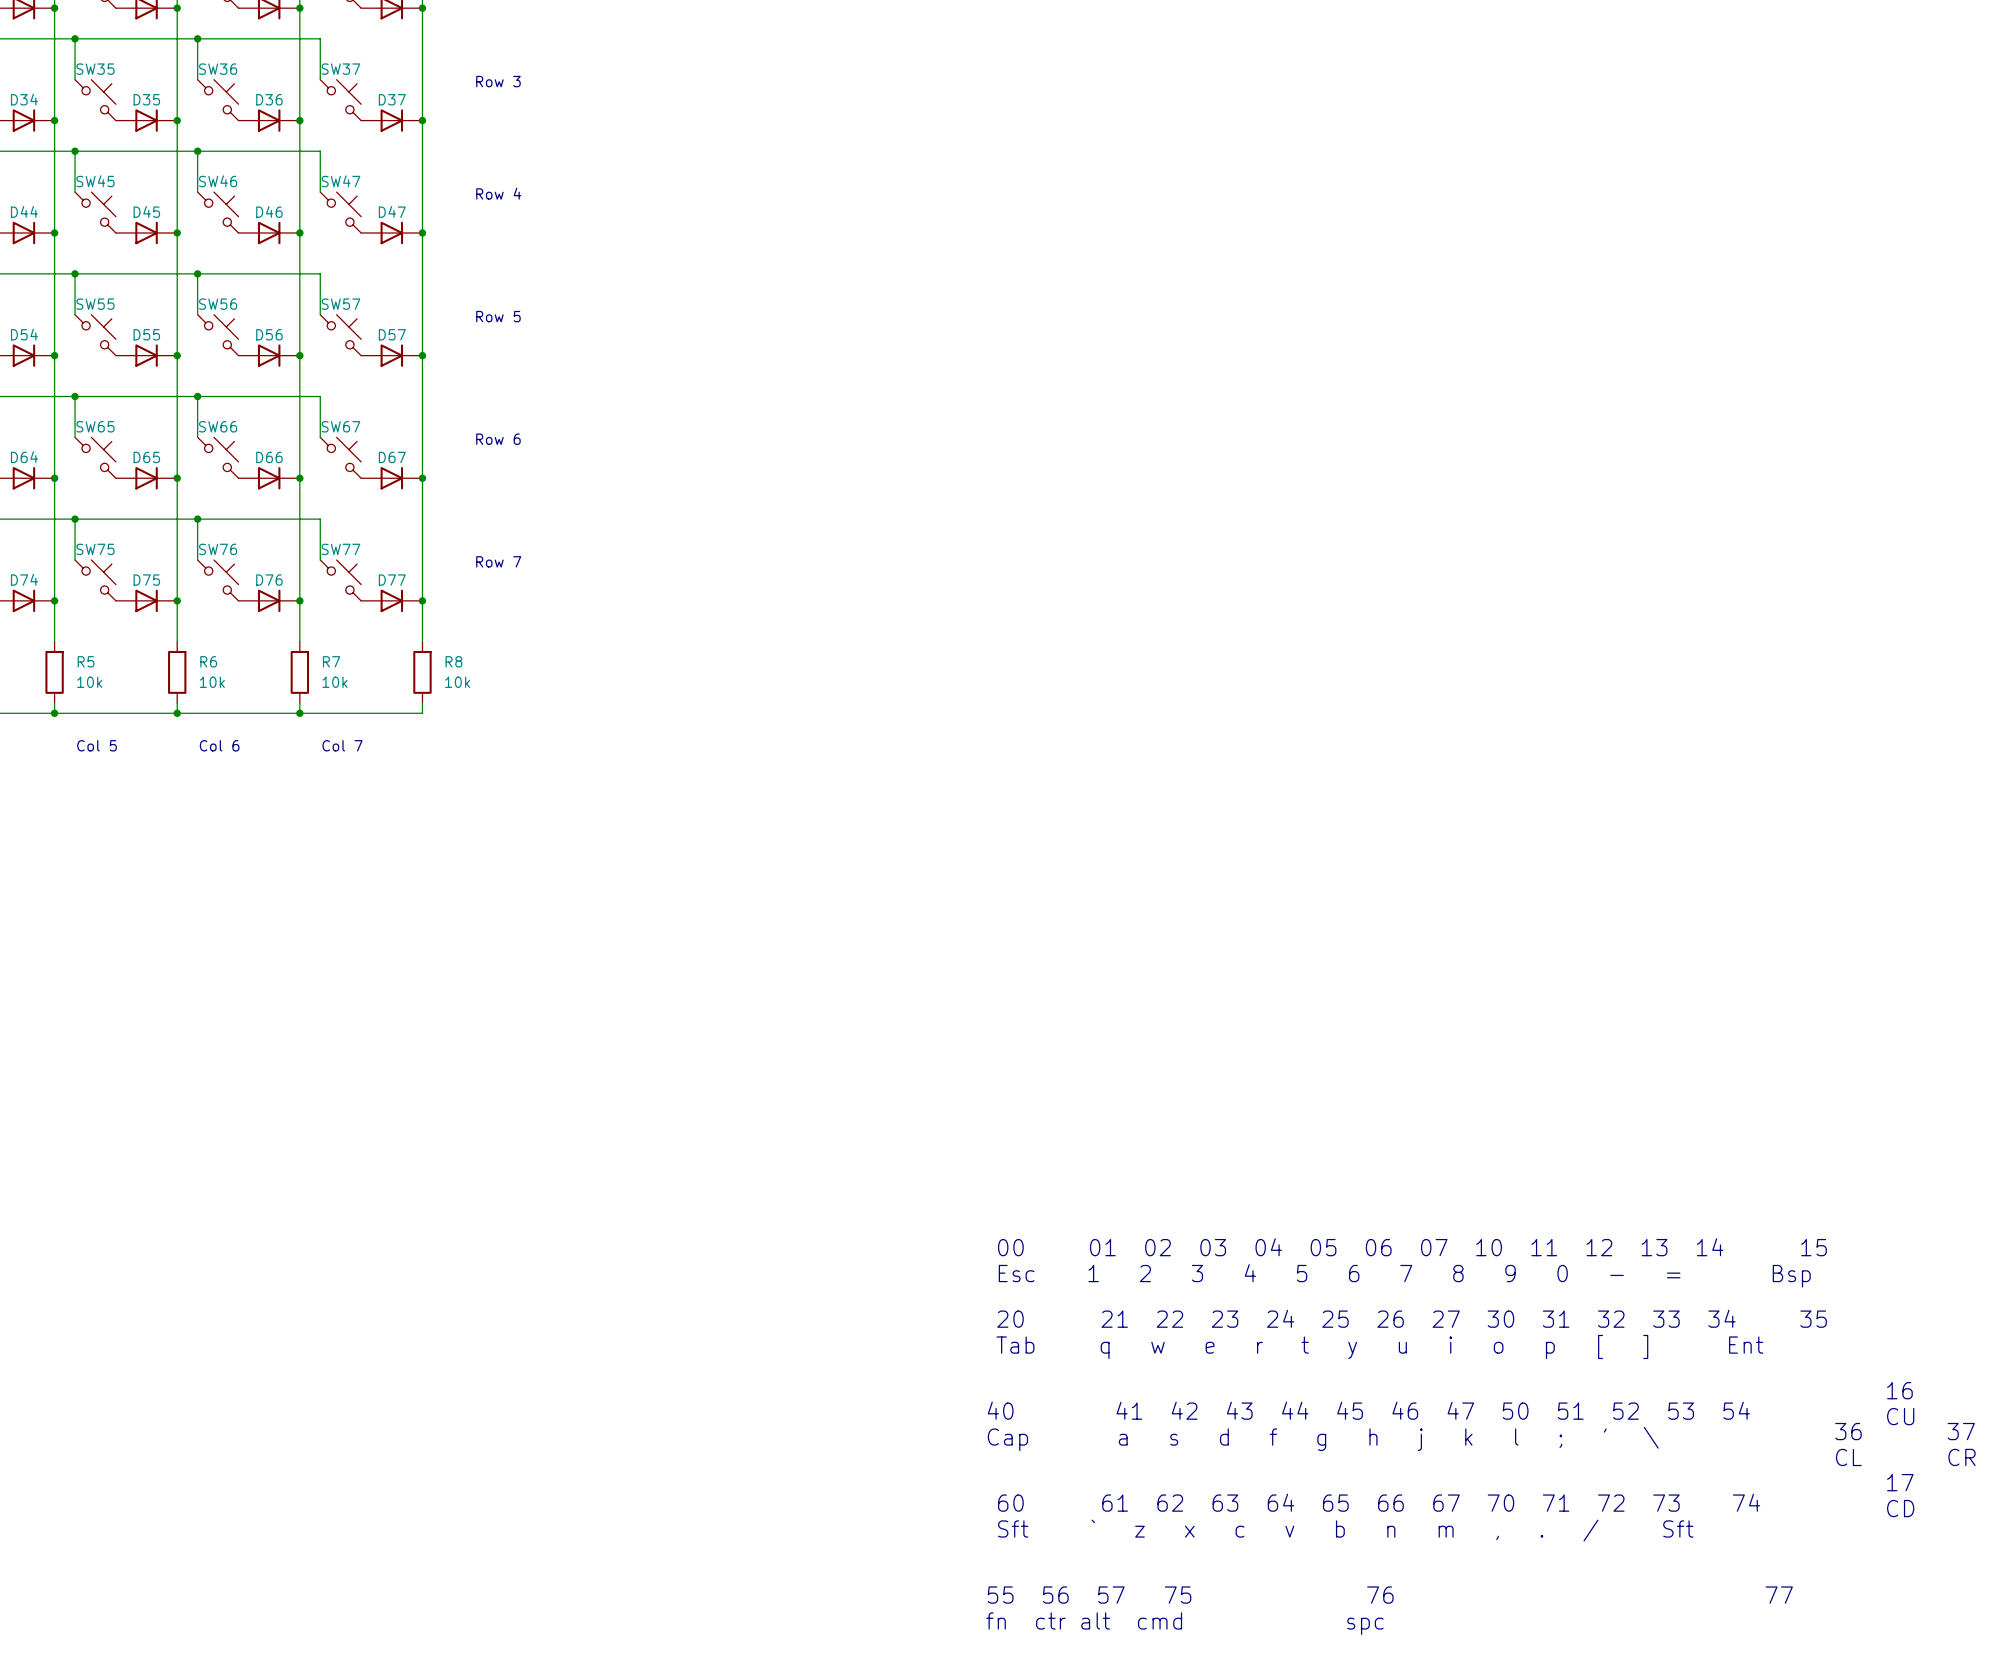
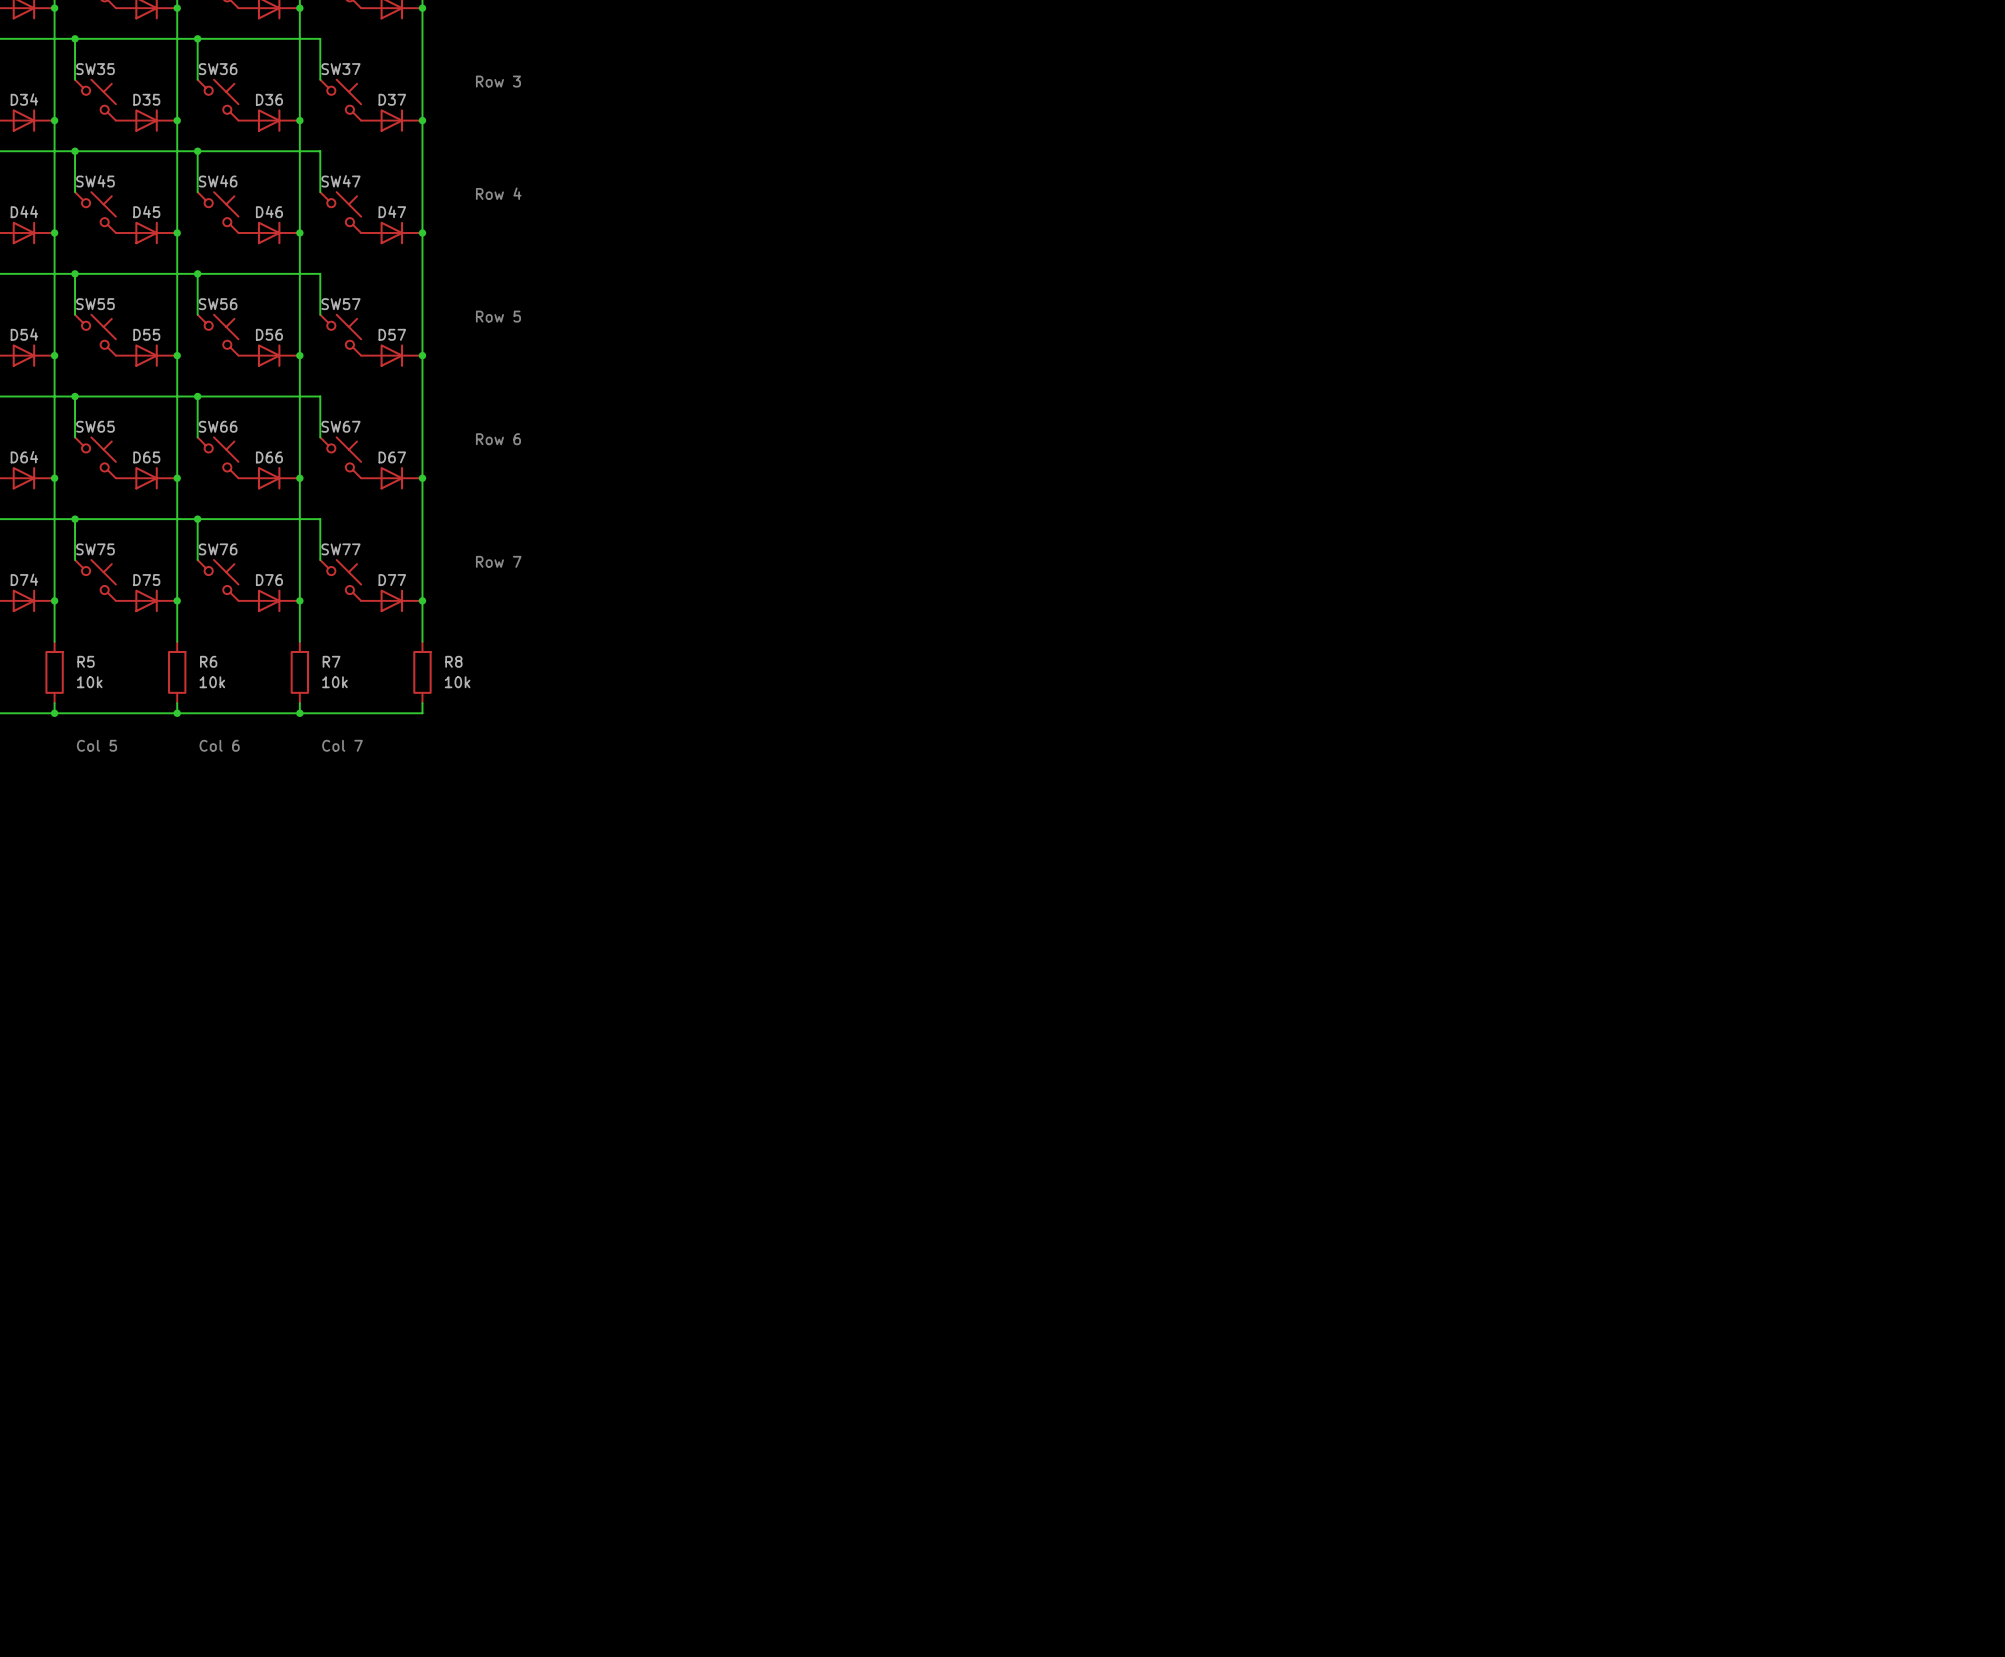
text: 00 01 02 03 04 05 06 07 10 11 12 13 14 15 (1412, 1247) -> none
text: Esc 1 2 3 4 5 6 7 8 9 0 - = Bsp (1404, 1275) -> none
text: 20 21 22 23 24 25 26 27 30 31 32 33 34 35 (1412, 1318) -> none
text: Tab q w e r t y u i o p [ ] Ent (1379, 1346) -> none
text: 16 (1899, 1390) -> none
text: 40 41 42 43 44 45 46 47 50 51 52 53 54 (1368, 1410) -> none
text: CU (1900, 1416) -> none
text: 36 (1848, 1431) -> none
text: 37 (1961, 1431) -> none
text: Cap a s d f g h j k l ; ' \ (1323, 1438) -> none
text: CL (1848, 1457) -> none
text: CR (1962, 1457) -> none
text: 17 (1900, 1482) -> none
text: 60 61 62 63 64 65 66 67 70 71 72 73 74 (1379, 1502) -> none
text: CD (1900, 1508) -> none
text: Sft ` z x c v b n m , . / Sft (1345, 1530) -> none
text: 55 56 57 75 76 77 (1390, 1595) -> none
text: fn ctr alt cmd spc (1184, 1623) -> none

